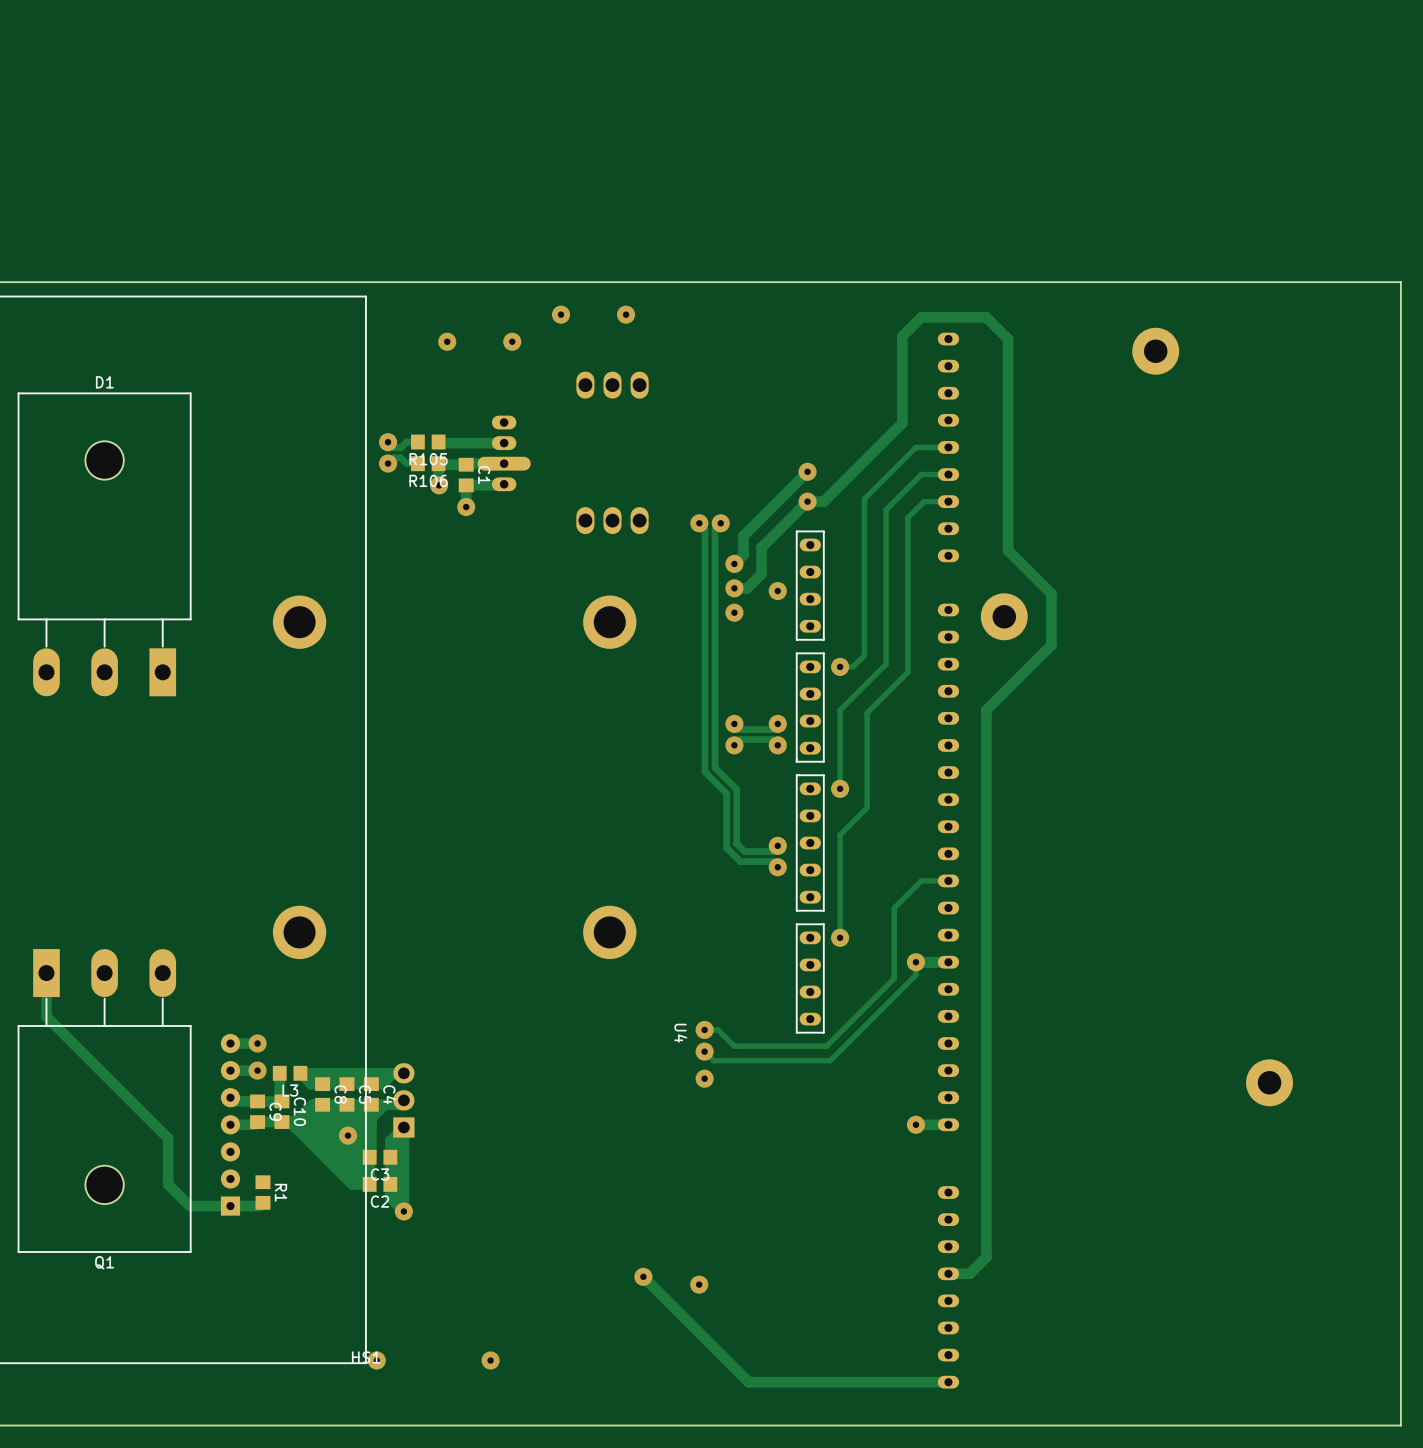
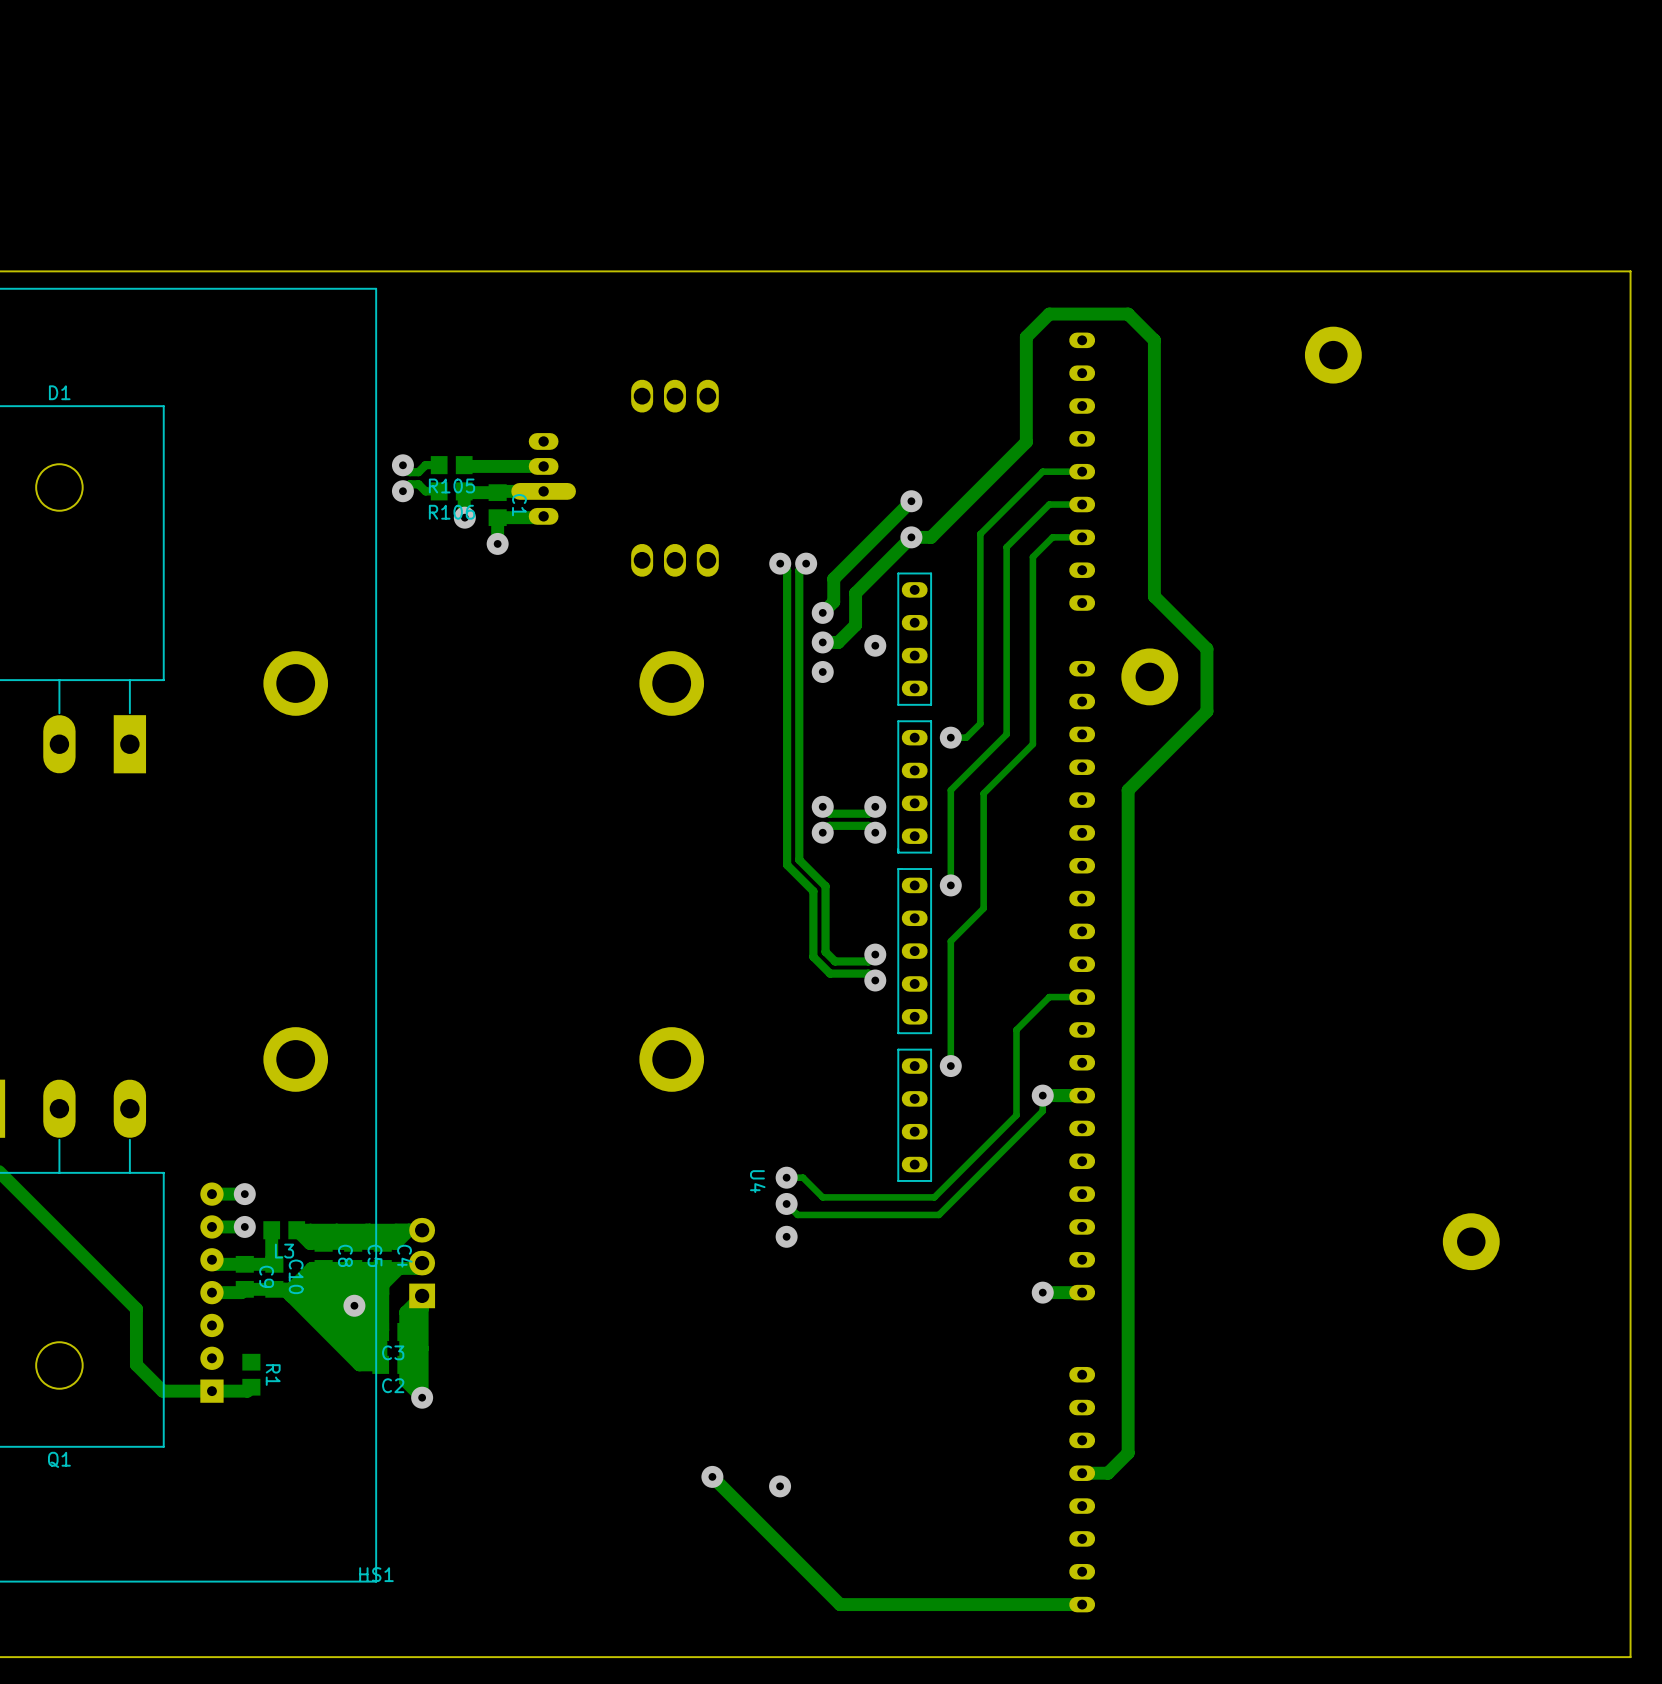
via: (561, 314) -> none
via: (626, 314) -> none
via: (447, 341) -> none
via: (512, 341) -> none
via: (376, 1360) -> none
via: (490, 1360) -> none

